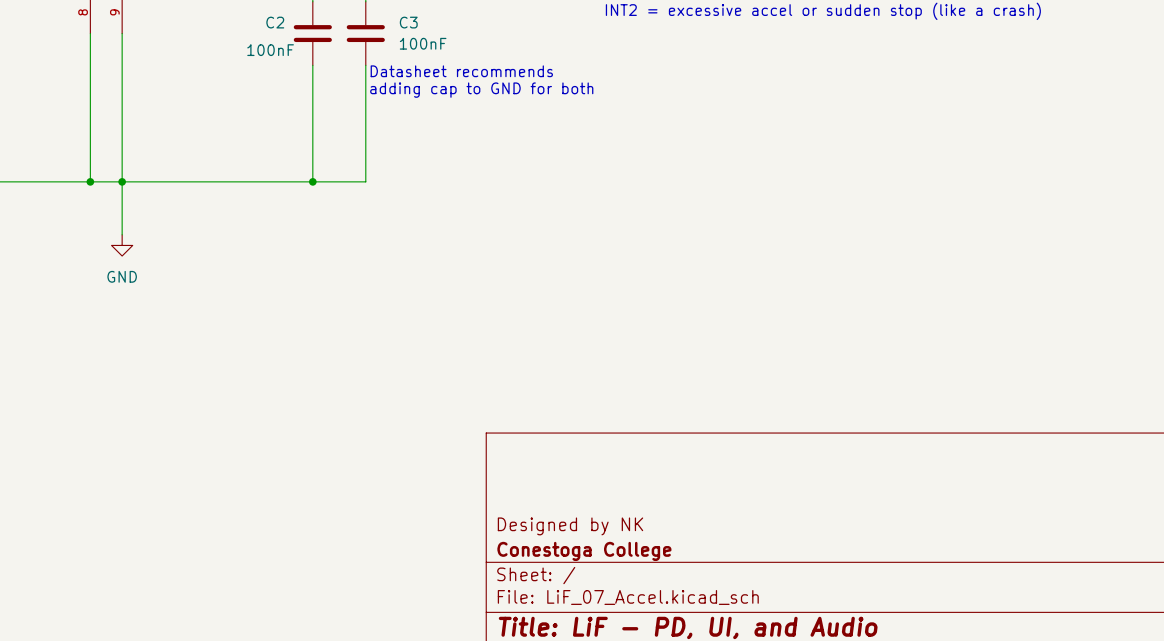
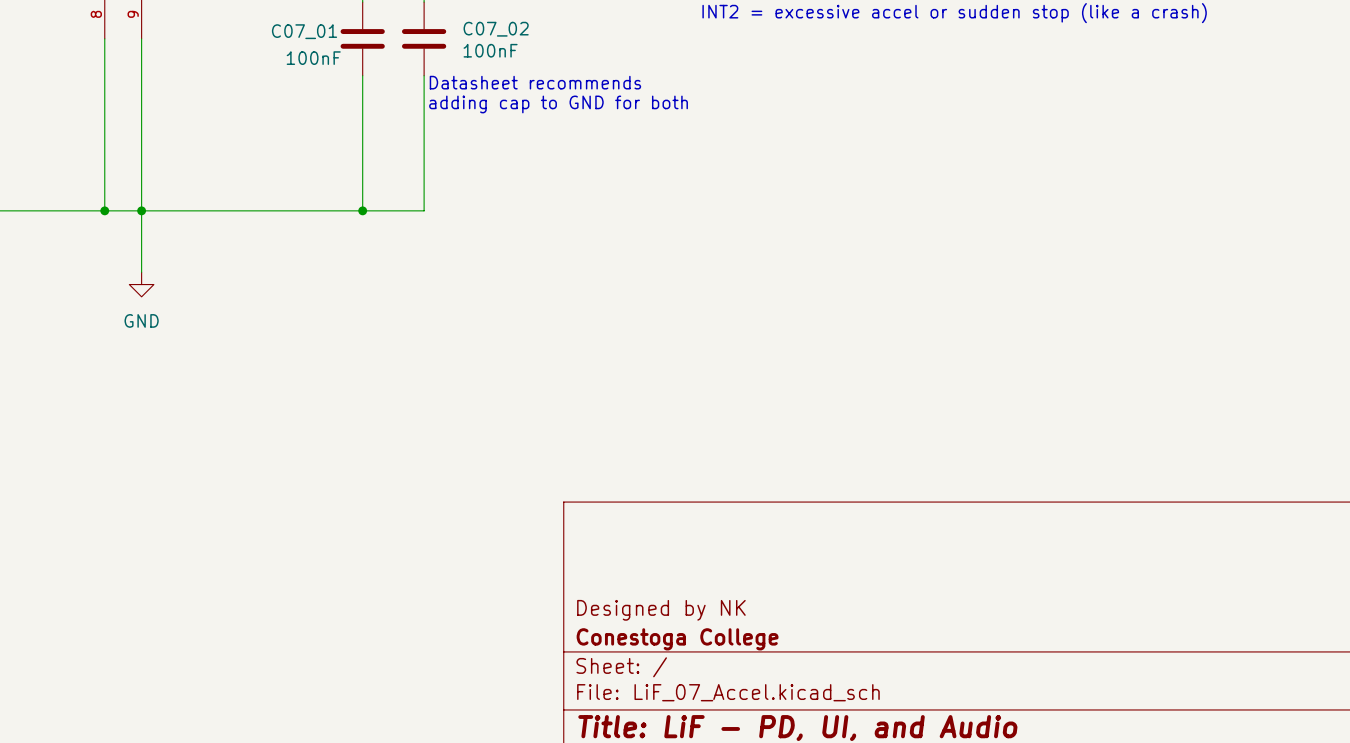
C2 name: C2 (275, 22) -> C07_01 (304, 31)
C3 name: C3 (408, 22) -> C07_02 (496, 29)

